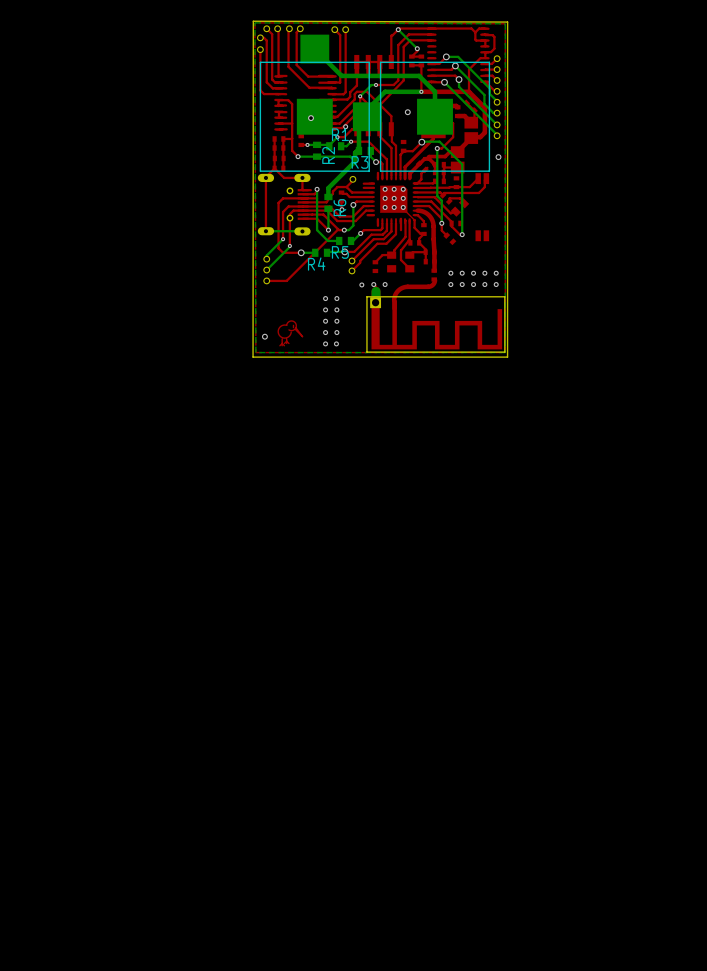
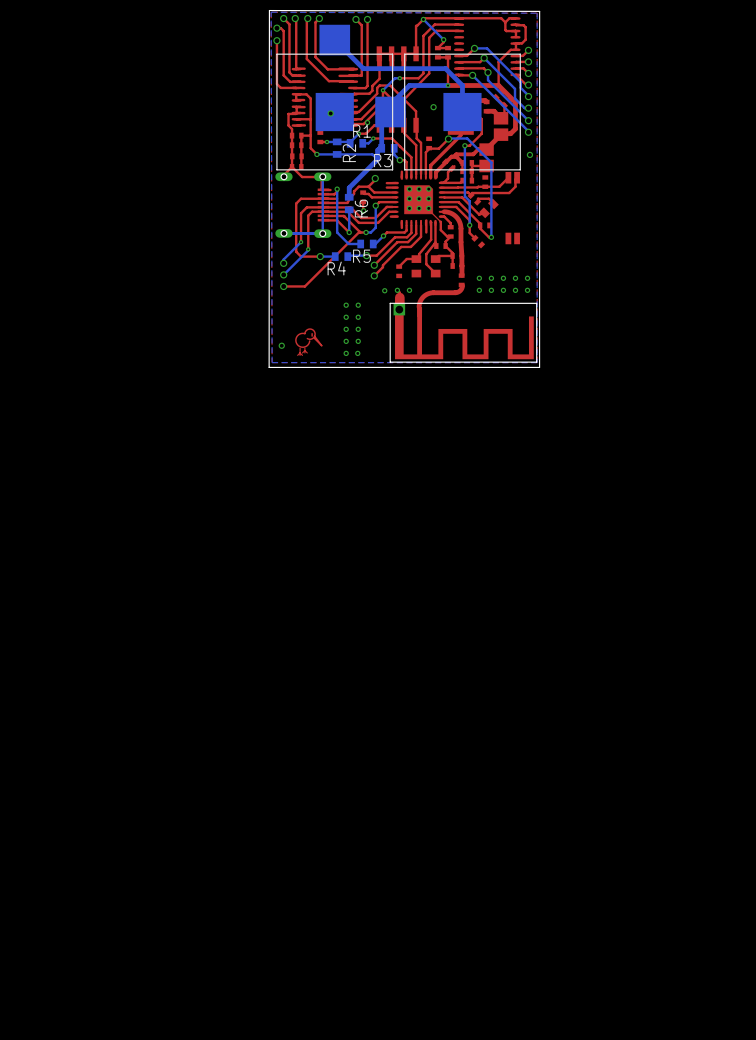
top track: none -> (296, 113) (288, 113) (288, 125) (292, 129) (292, 135)
part footprint: [257, 173, 311, 236] -> [275, 172, 332, 238]
top track: (265, 177) (265, 231) -> none
bottom track: none -> (322, 176) (322, 233) (283, 233)
bottom track: (376, 291) (376, 302) -> none

